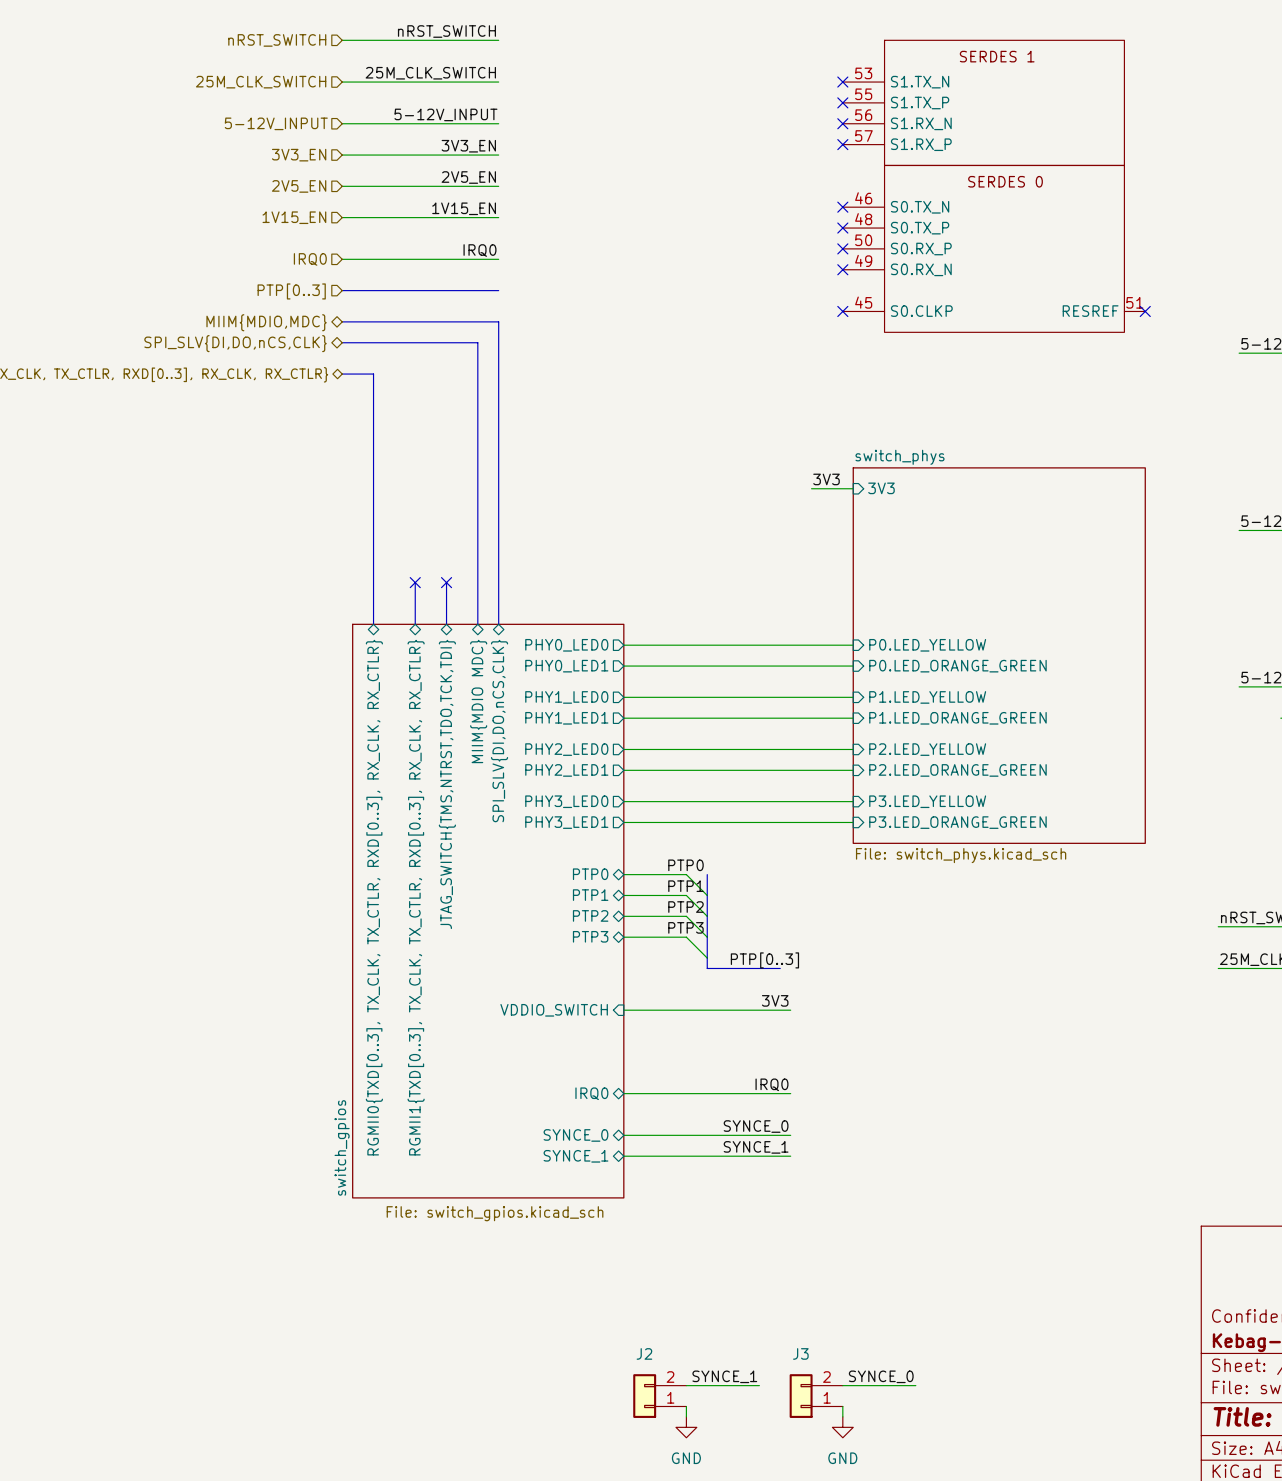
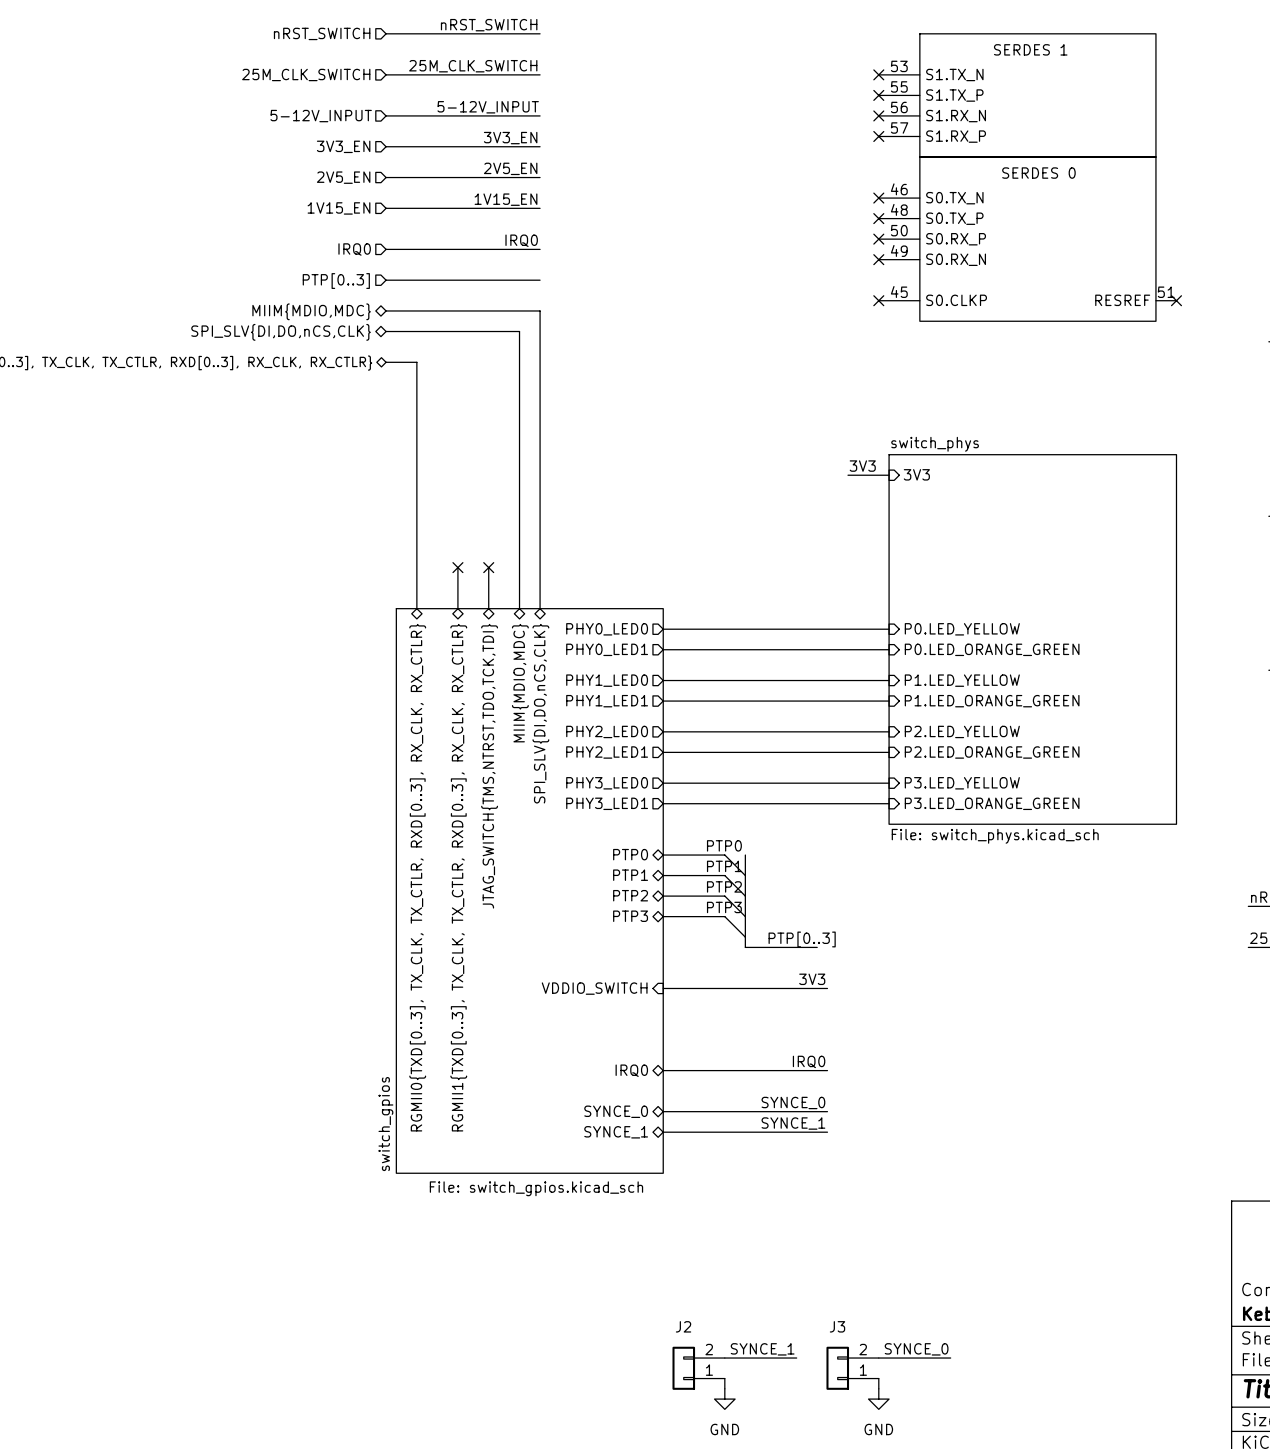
sheet pin: MIIM{MDIO MDC} (478, 701) -> MIIM{MDIO,MDC} (520, 683)

